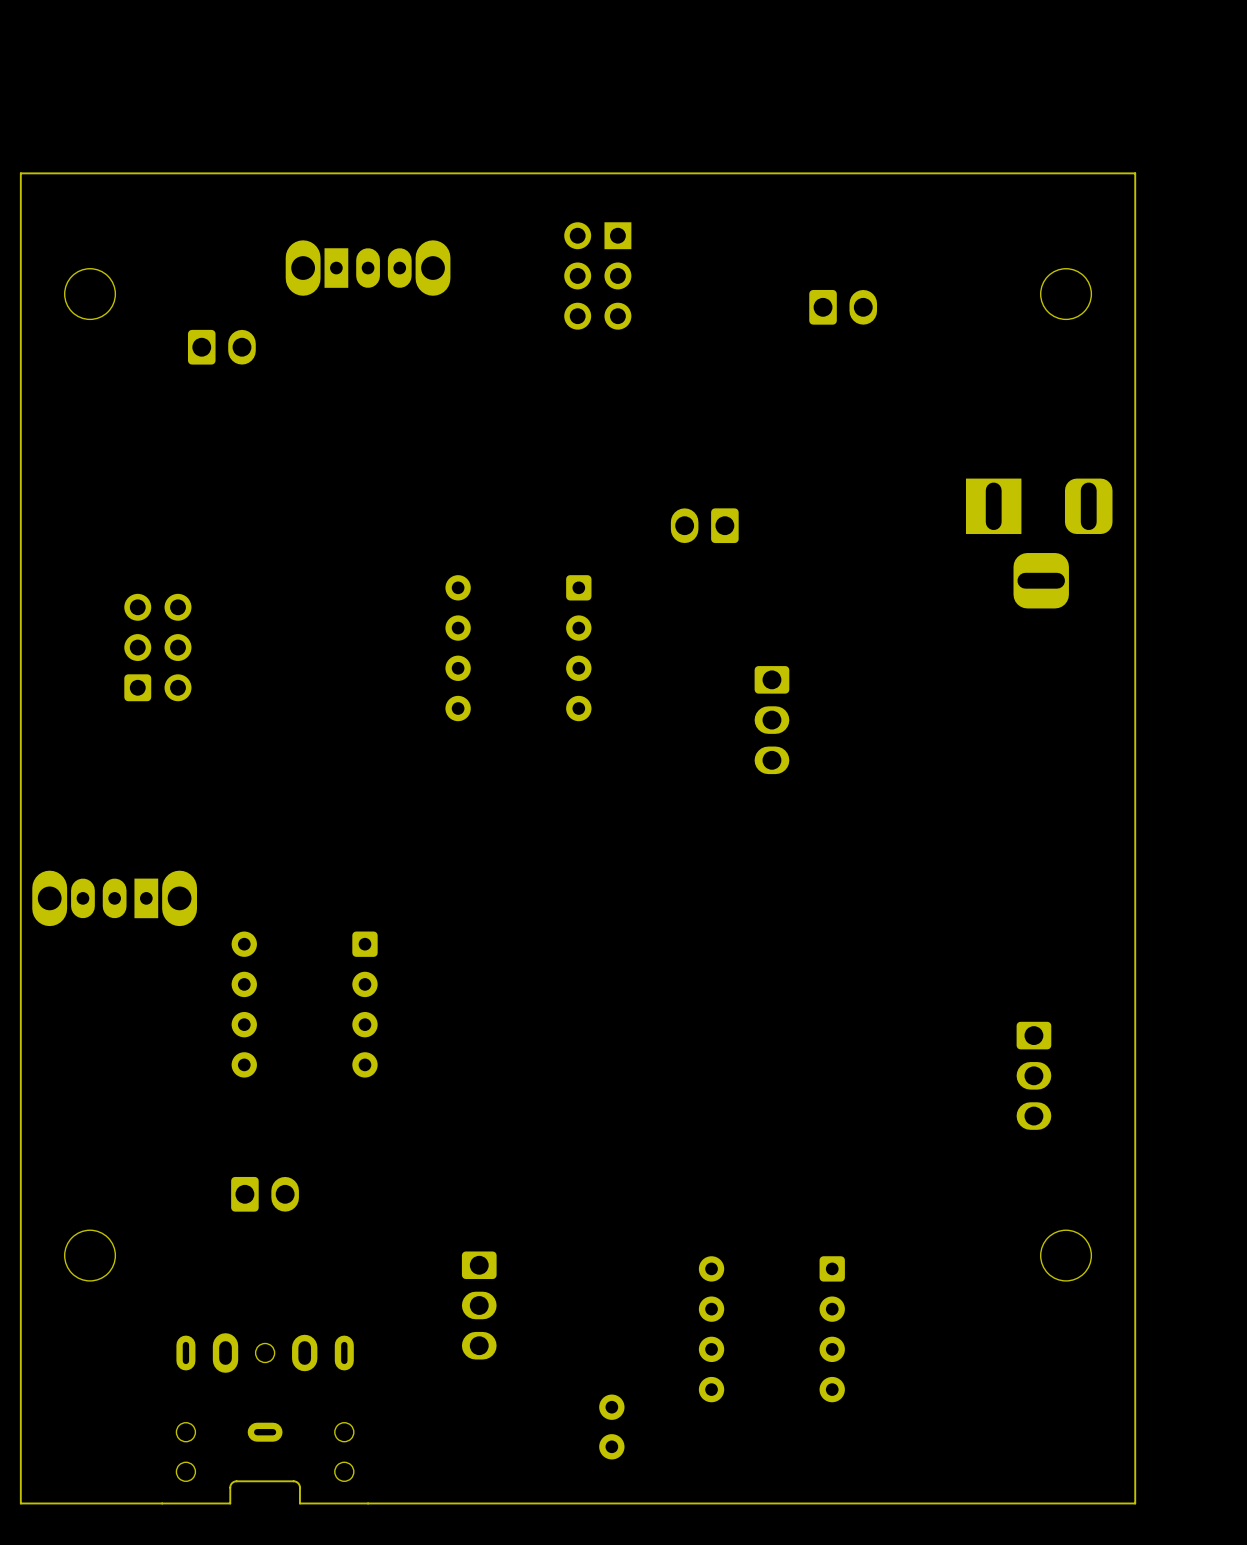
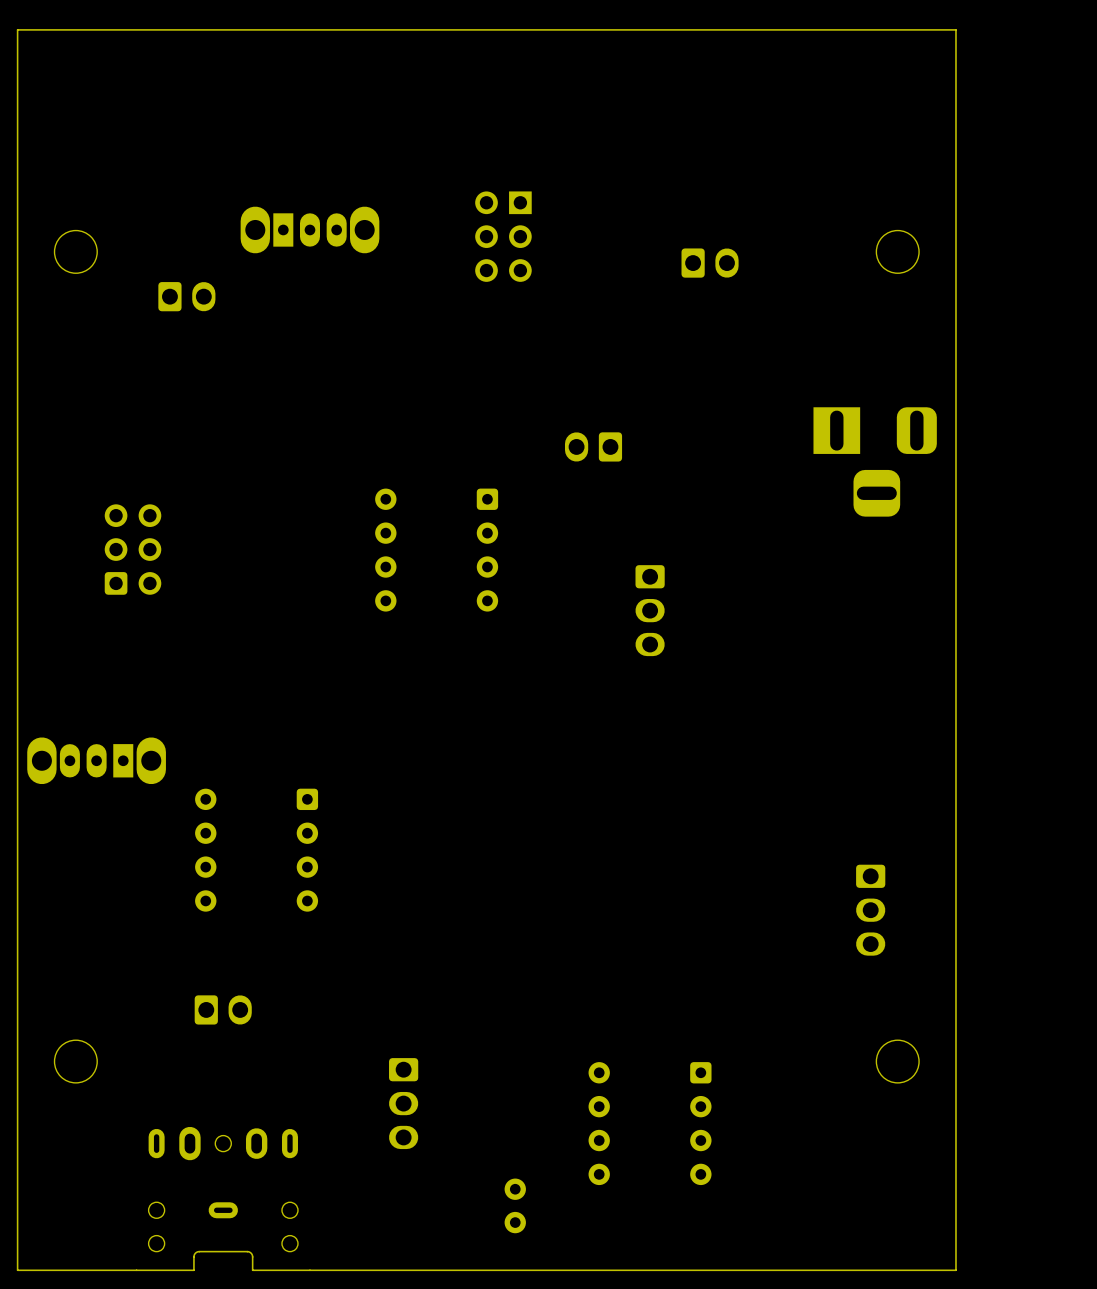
board edge: (1135, 173) (20, 173) -> (955, 150) (955, 29) (17, 29) (17, 150)

